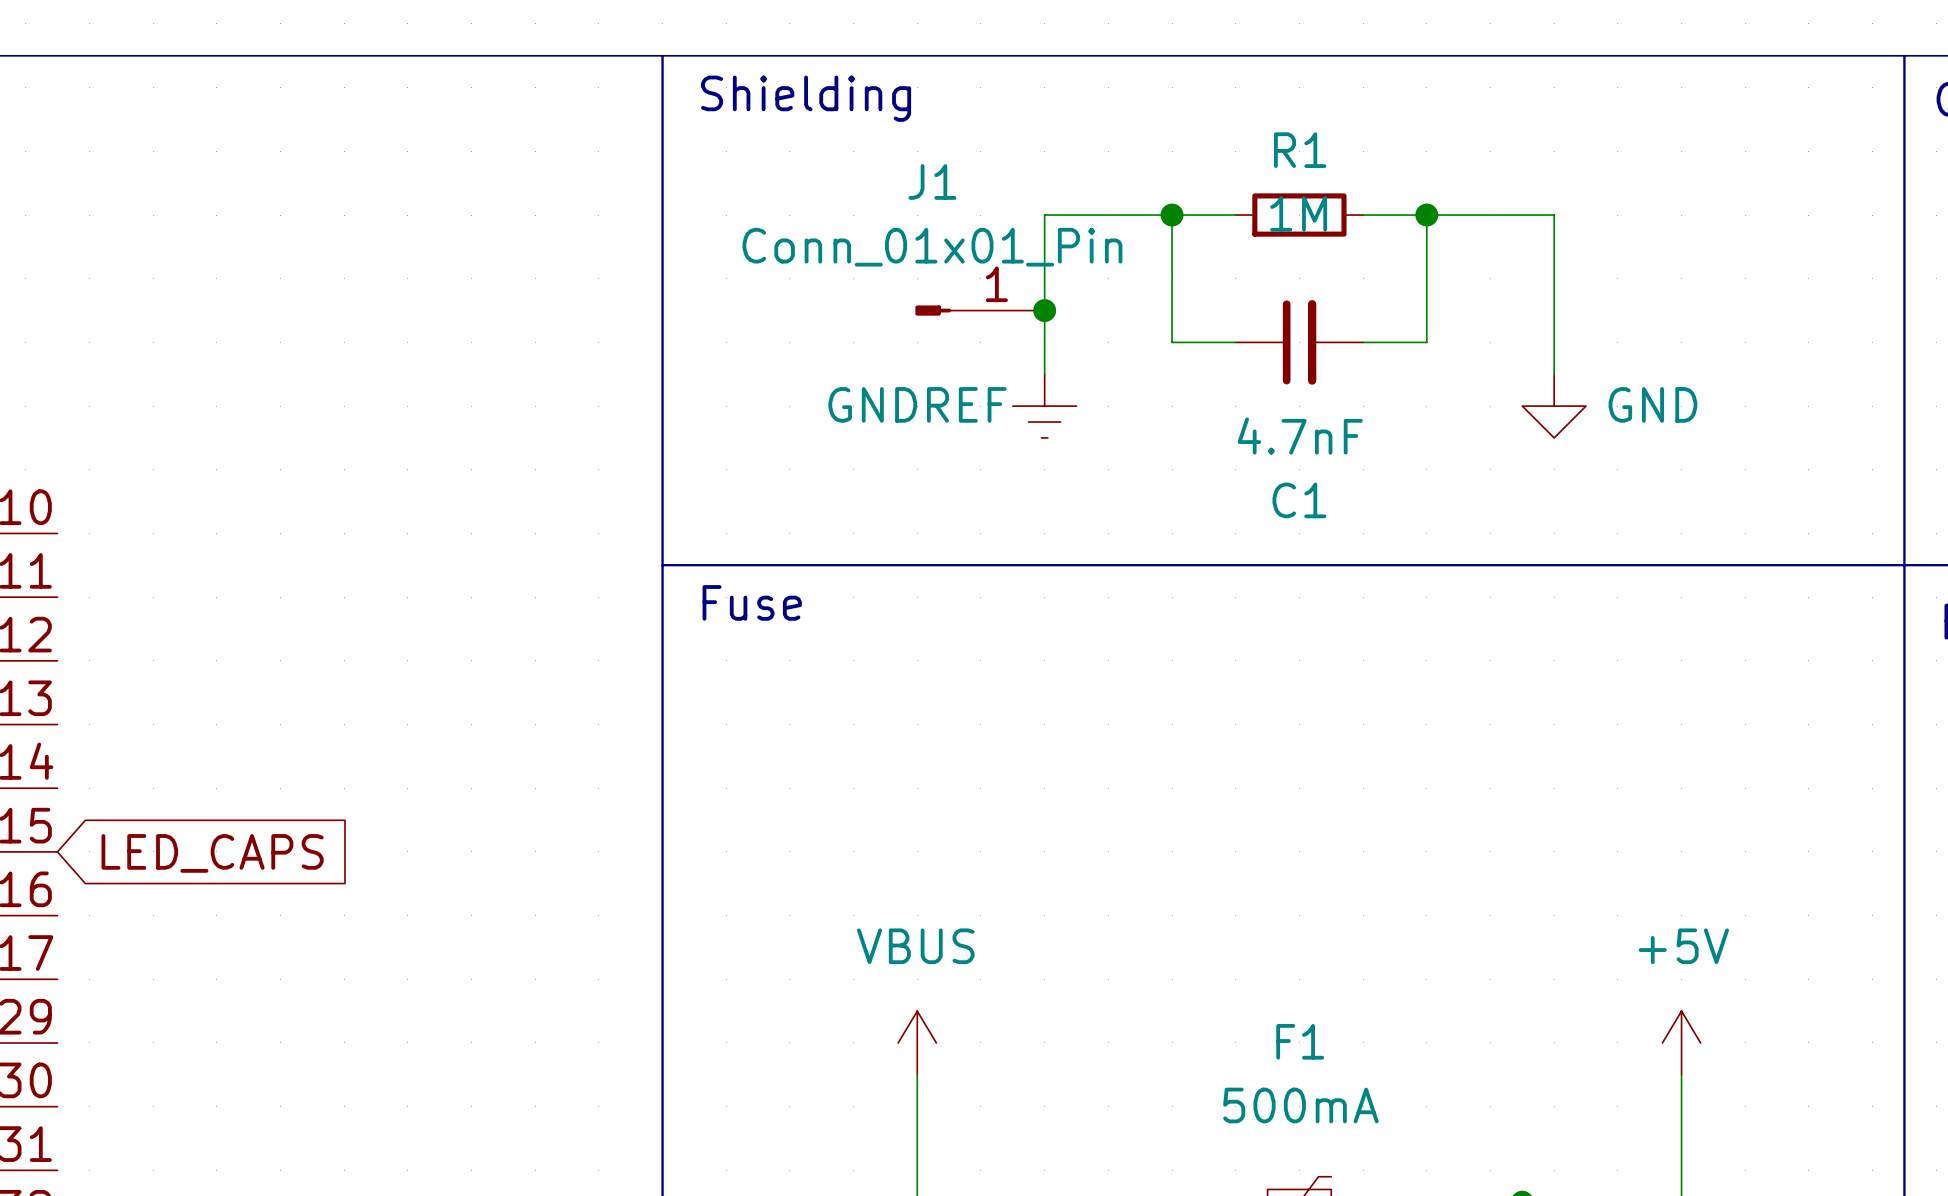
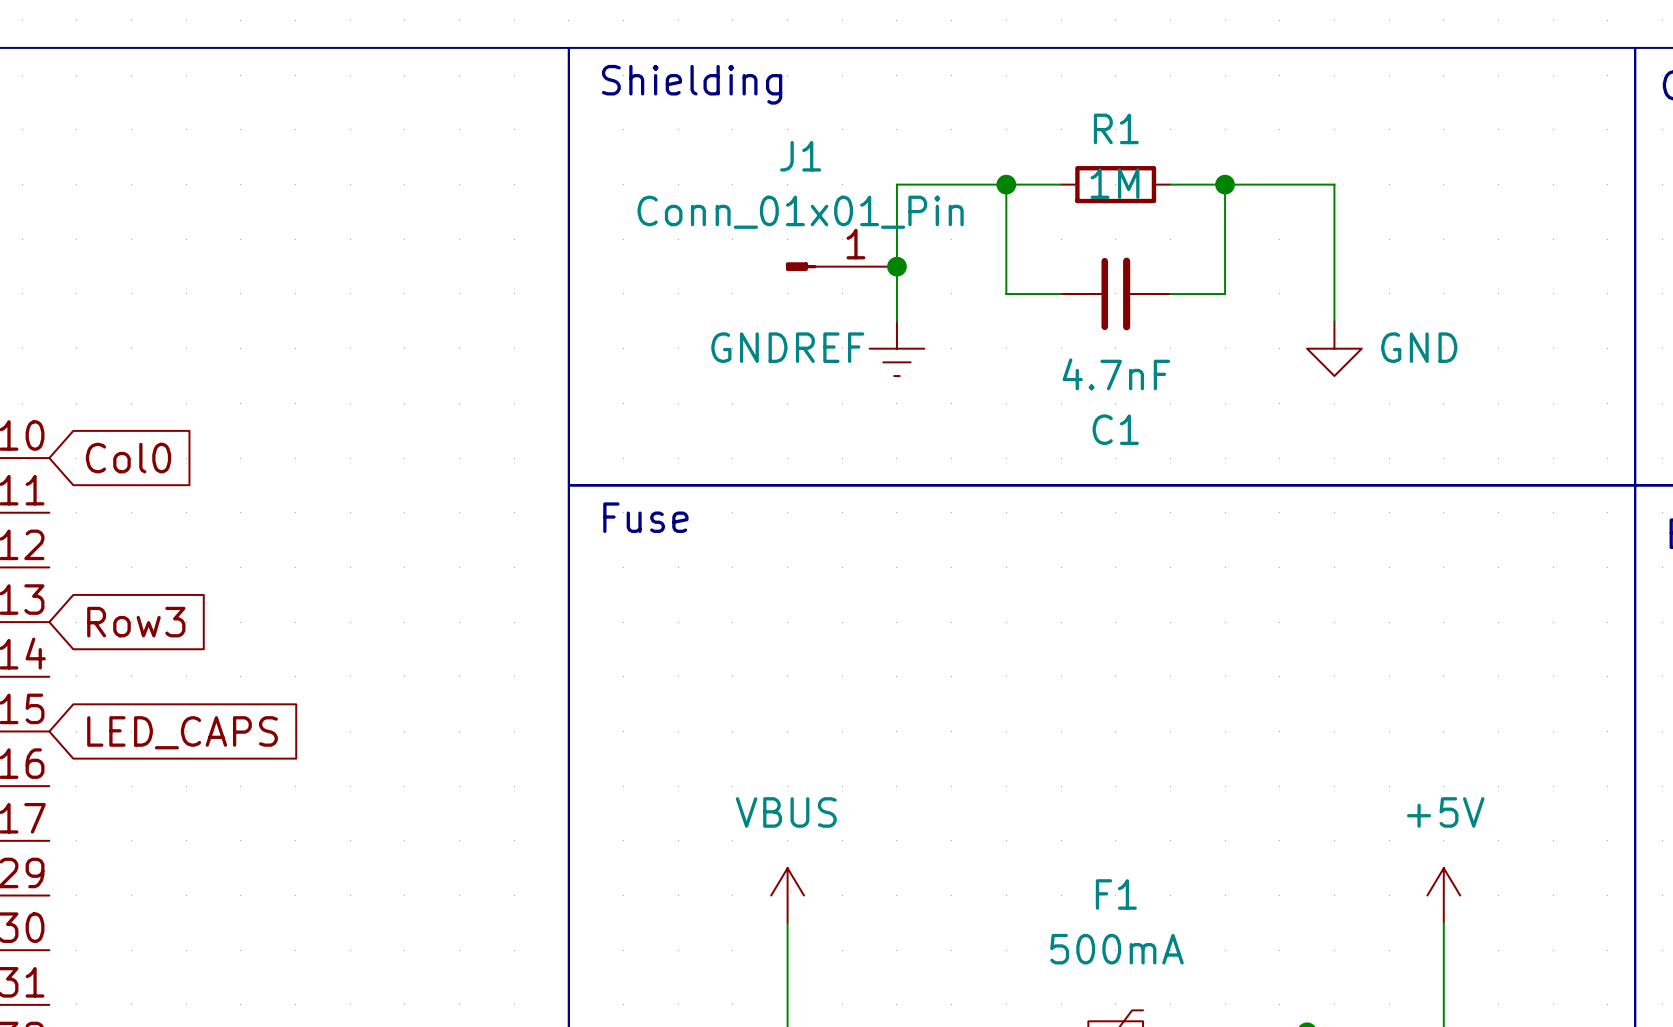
global label: none -> Col0 (128, 458)
global label: none -> Row3 (136, 622)

